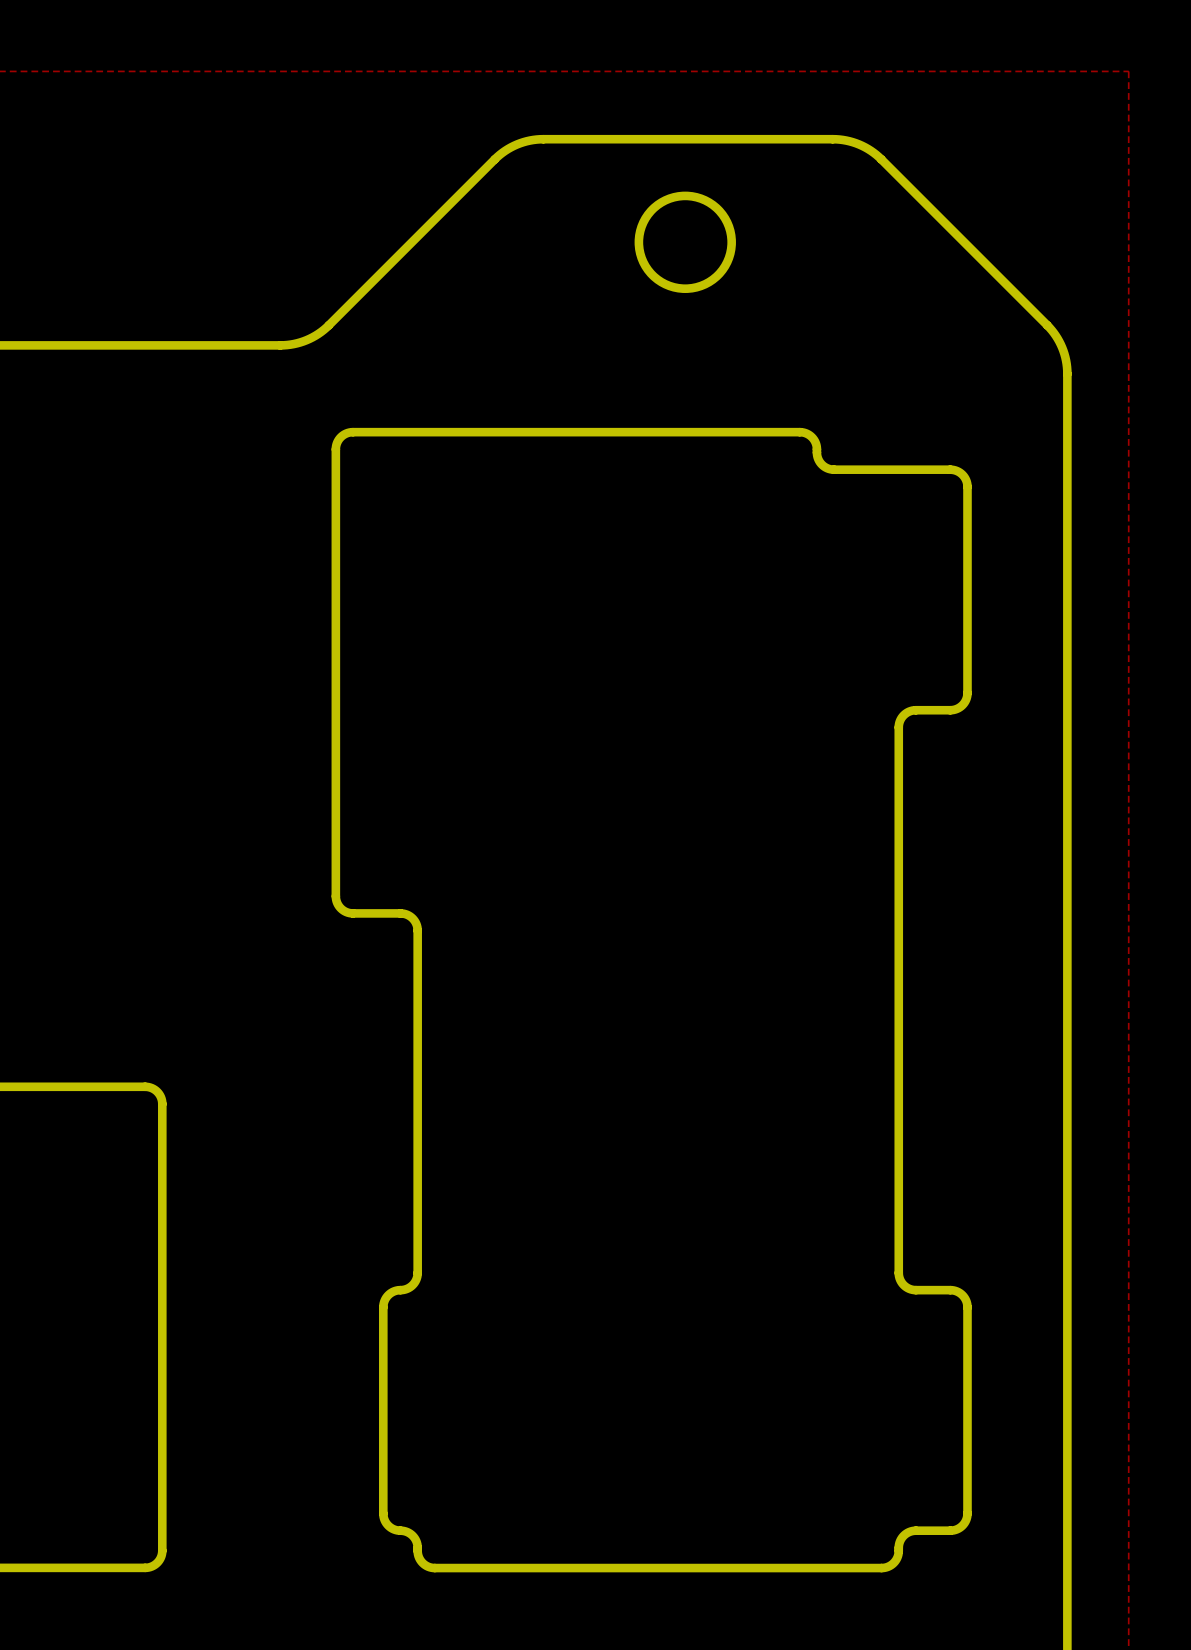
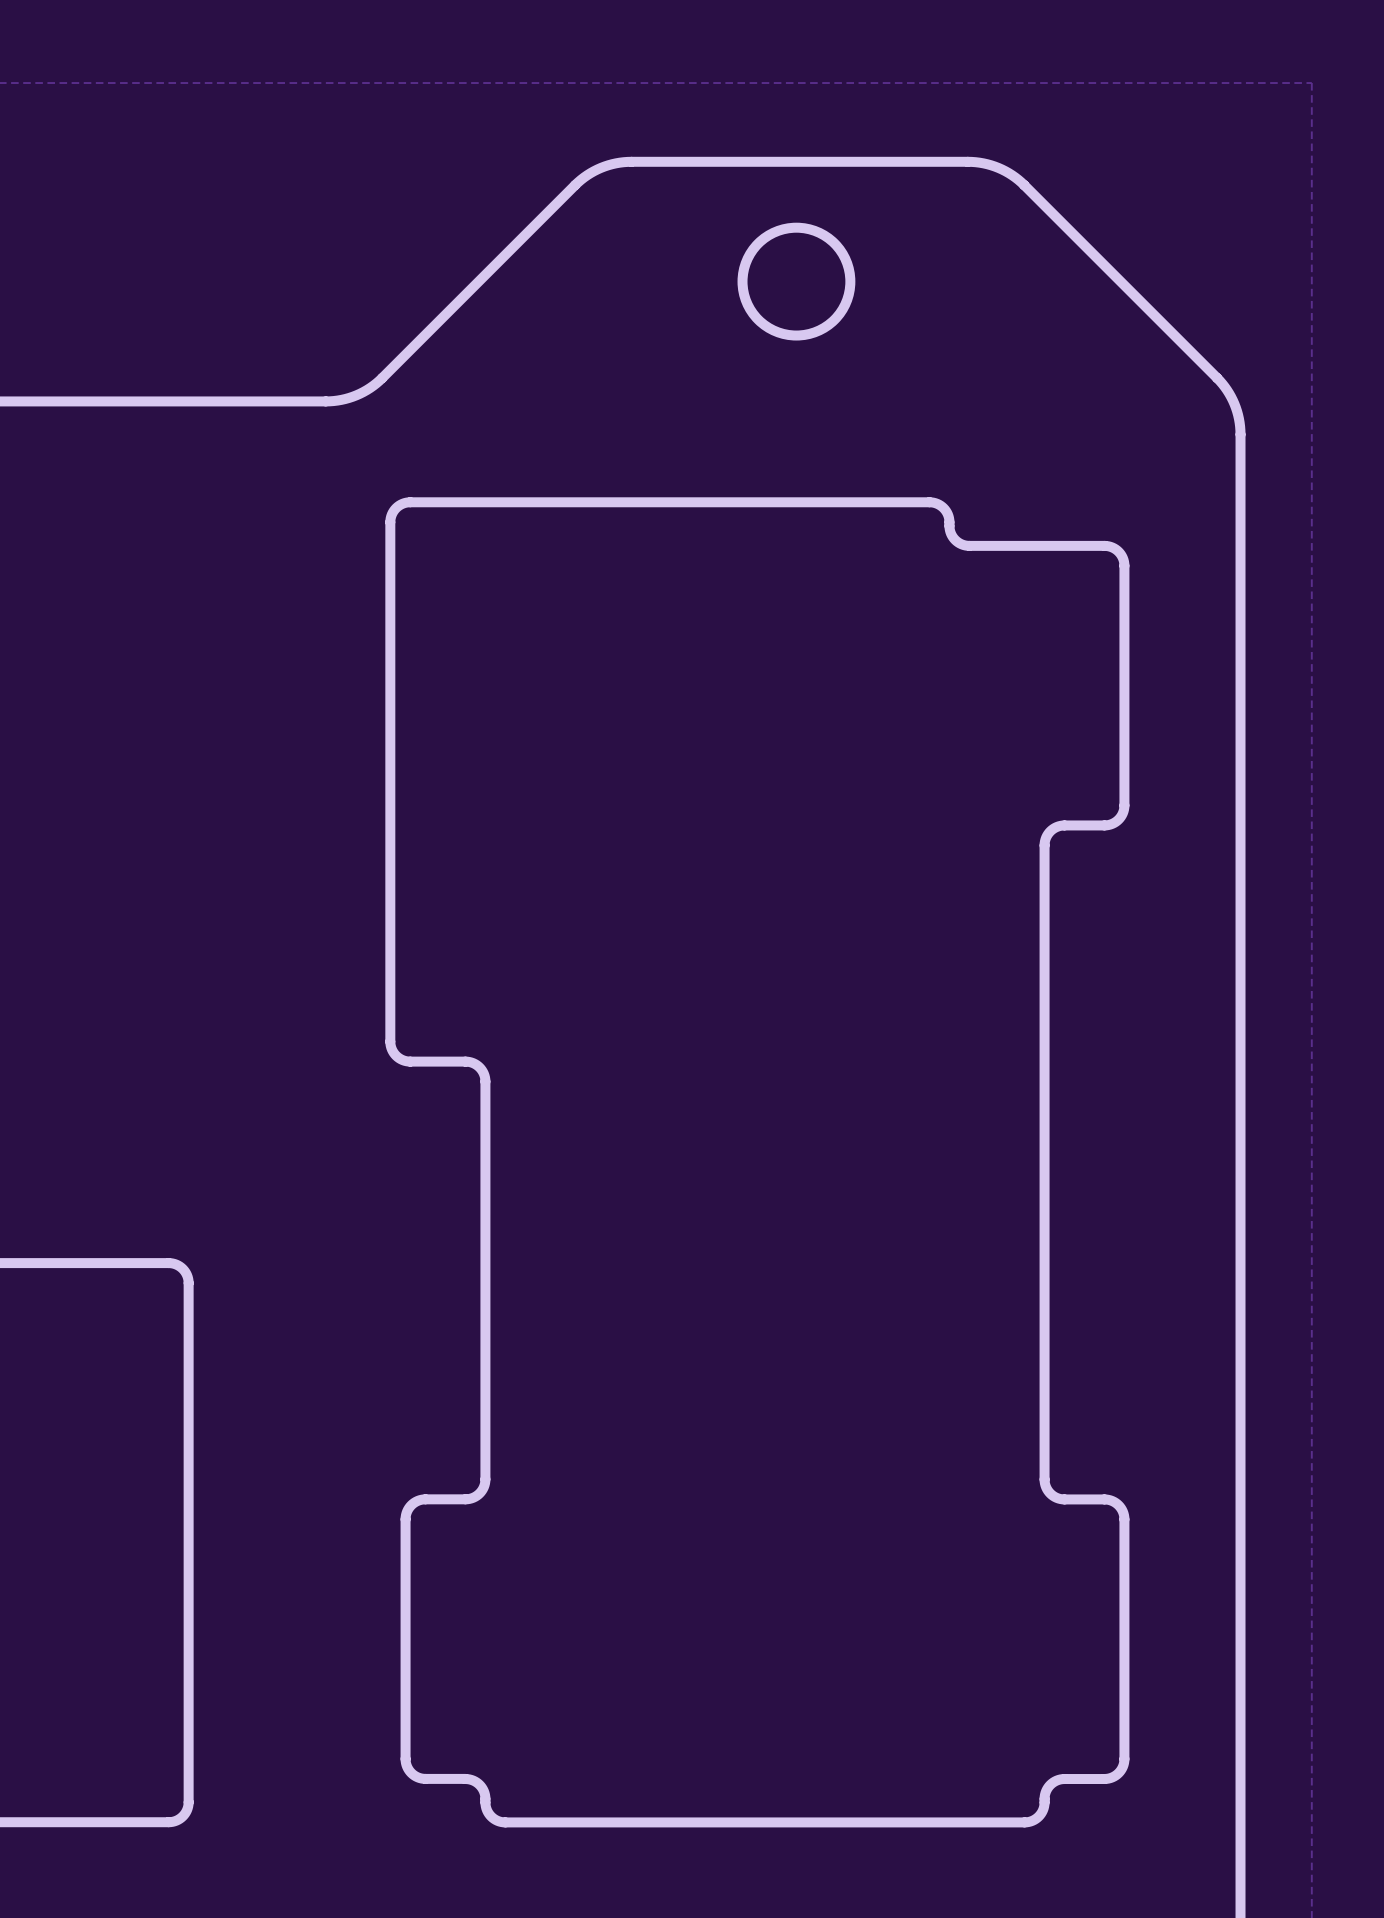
board edge: (417, 1272) (416, 1279) (411, 1286) (388, 1295) (383, 1307) (383, 1515) (385, 1521) (390, 1527) (407, 1532) (412, 1535) (417, 1547) -> (485, 1479) (482, 1490) (473, 1497) (421, 1499) (412, 1503) (406, 1513) (405, 1758) (407, 1768) (416, 1776) (423, 1778) (471, 1779) (482, 1787) (485, 1798)

